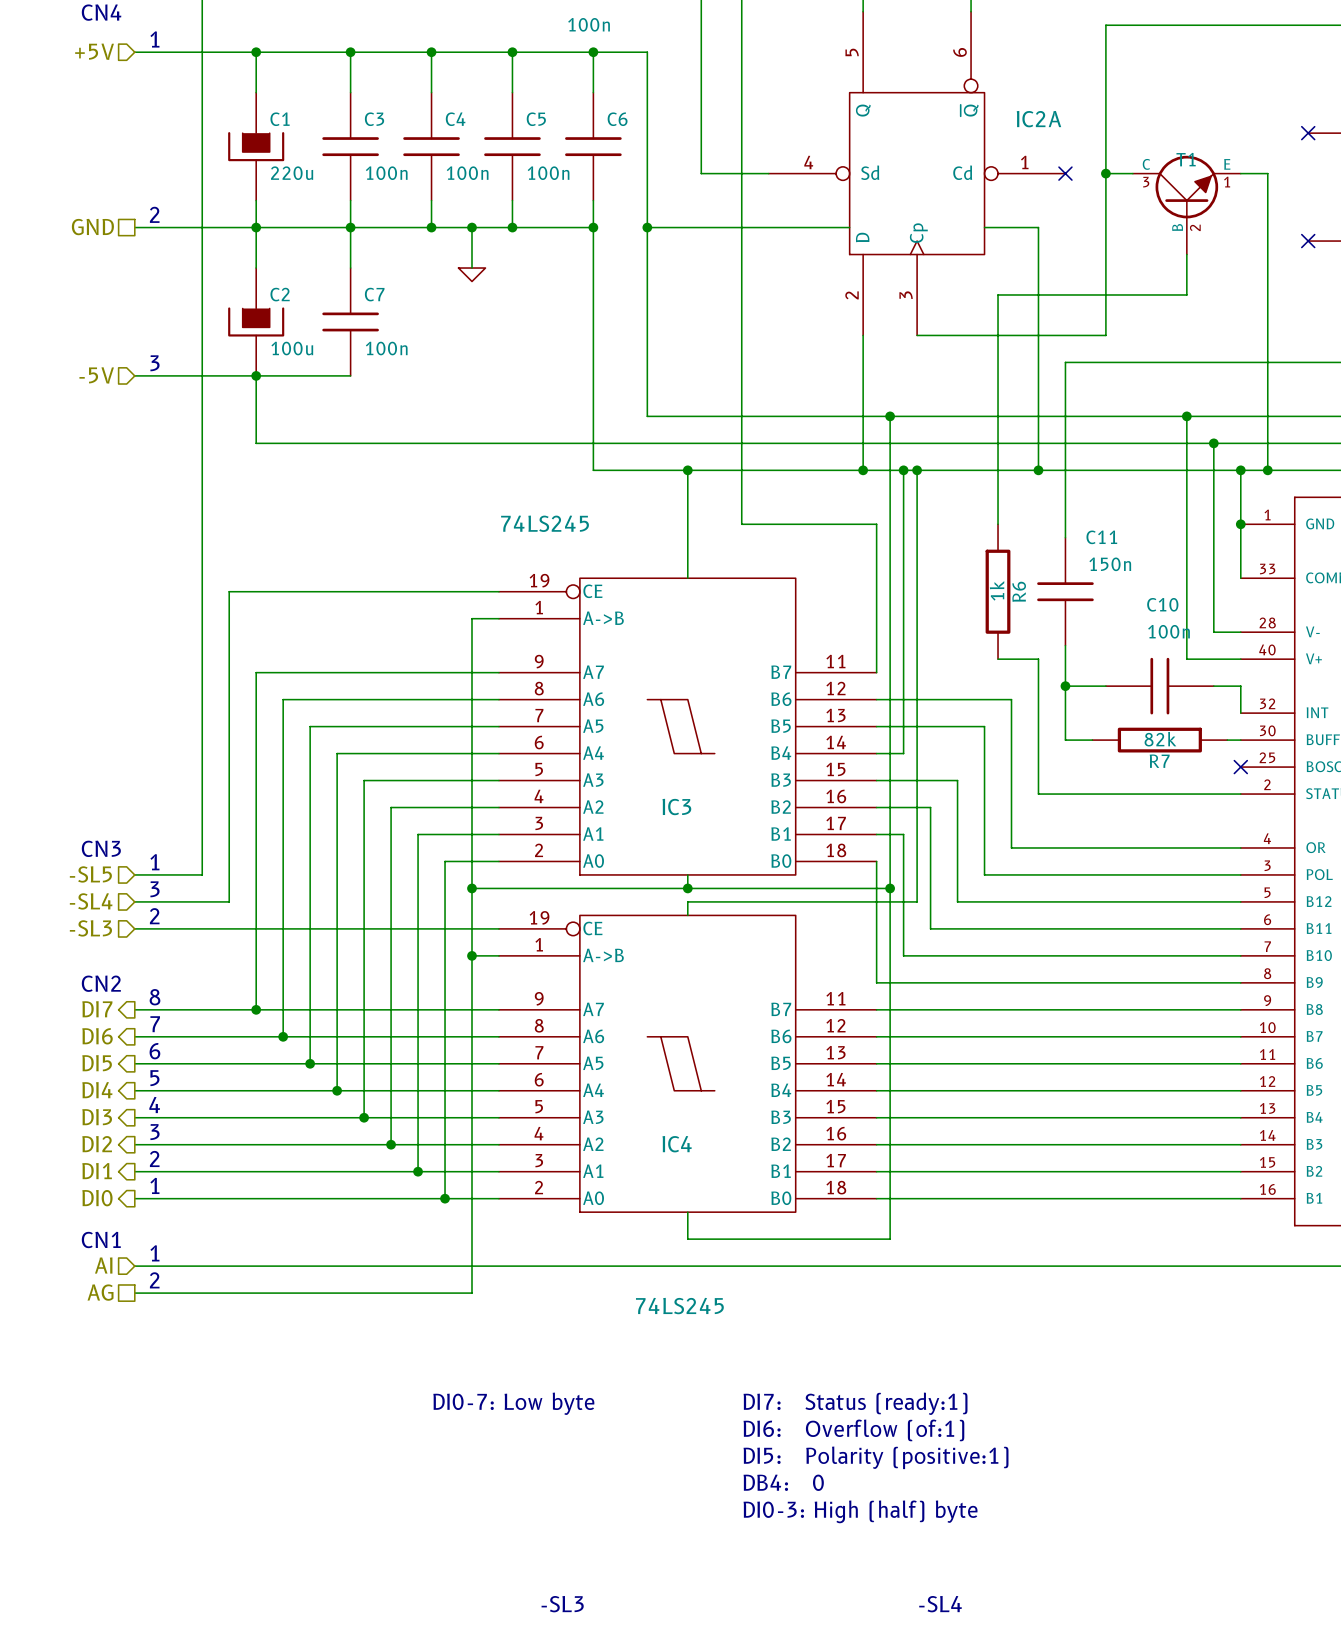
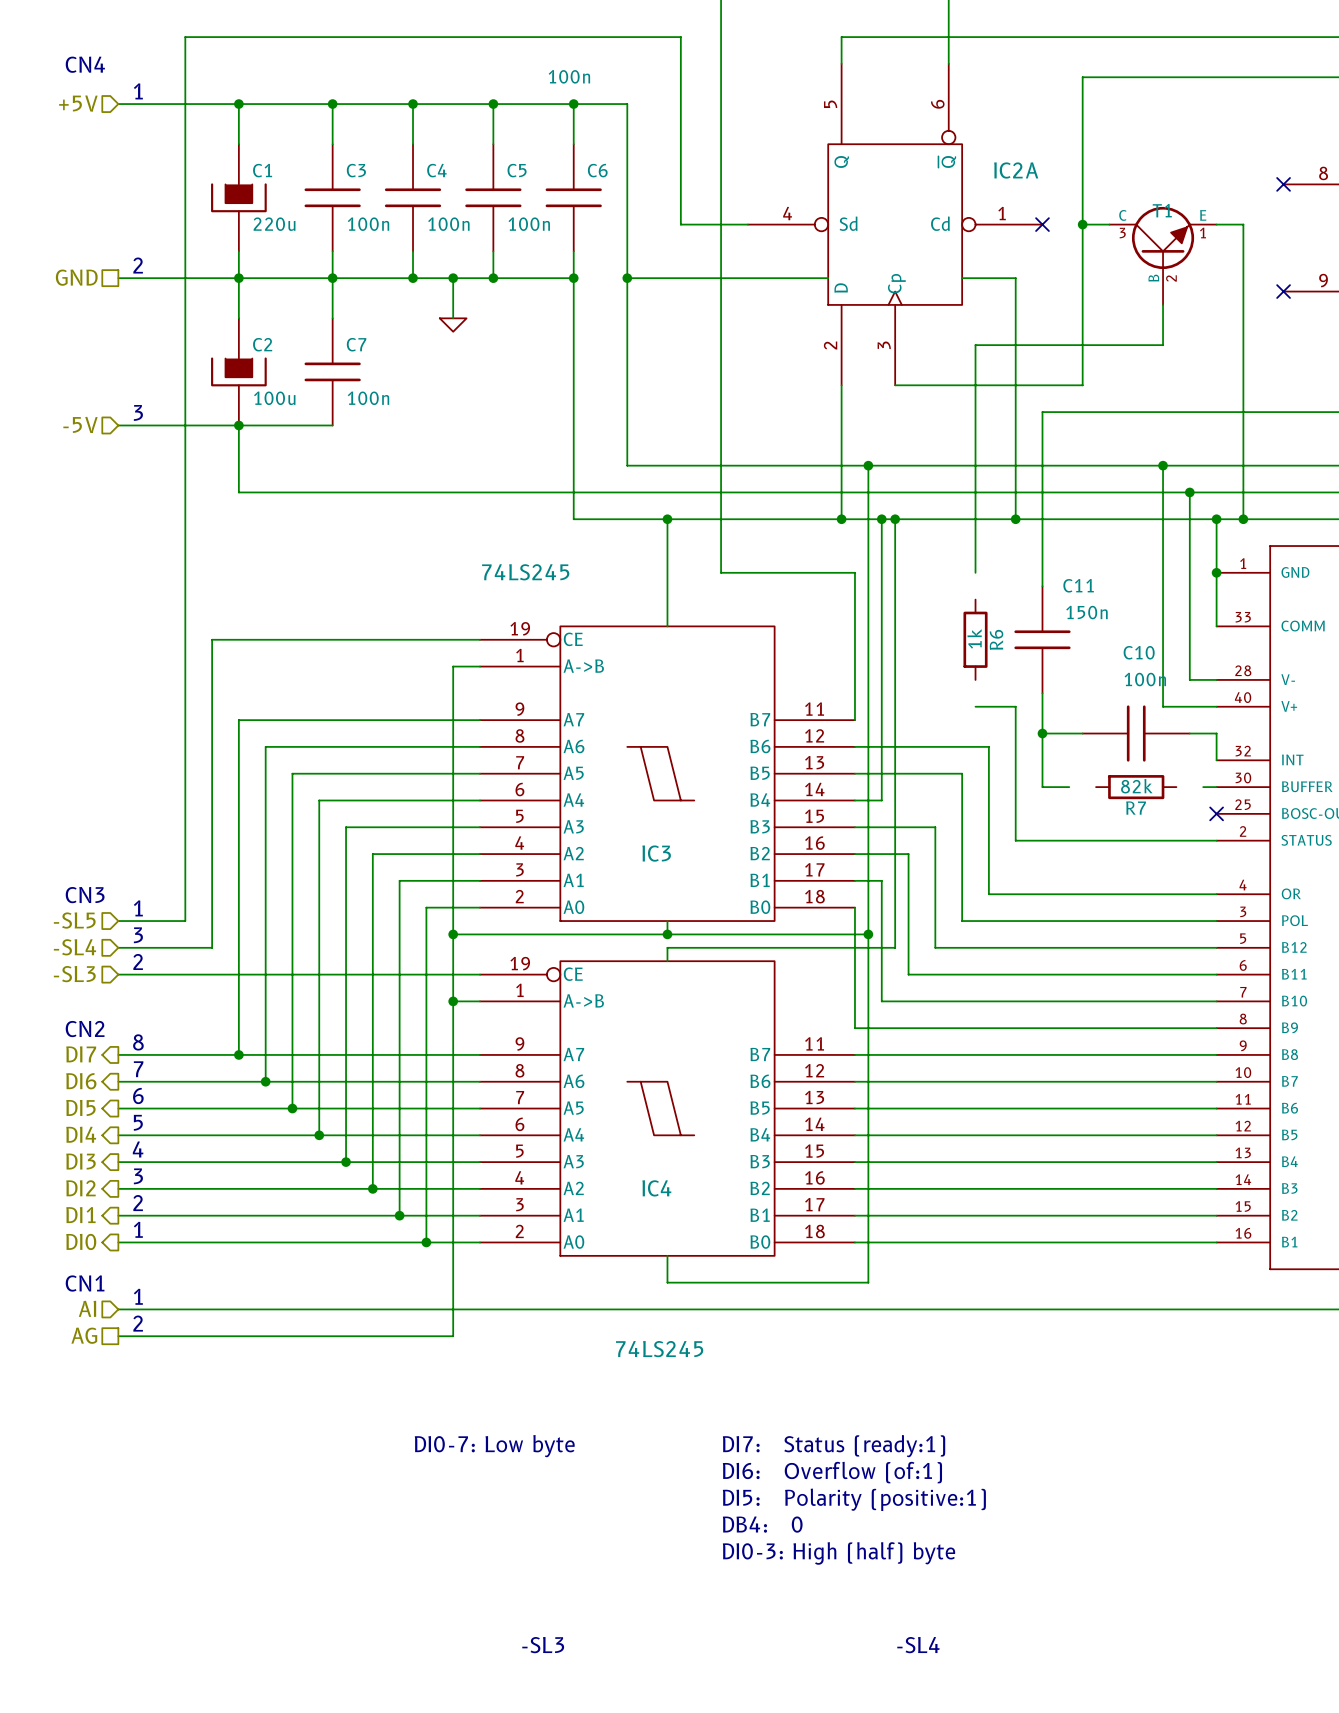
R6 symbol: [985, 524, 1011, 660] -> [963, 599, 988, 680]
R7 symbol: [1092, 727, 1228, 753] -> [1096, 775, 1177, 800]

